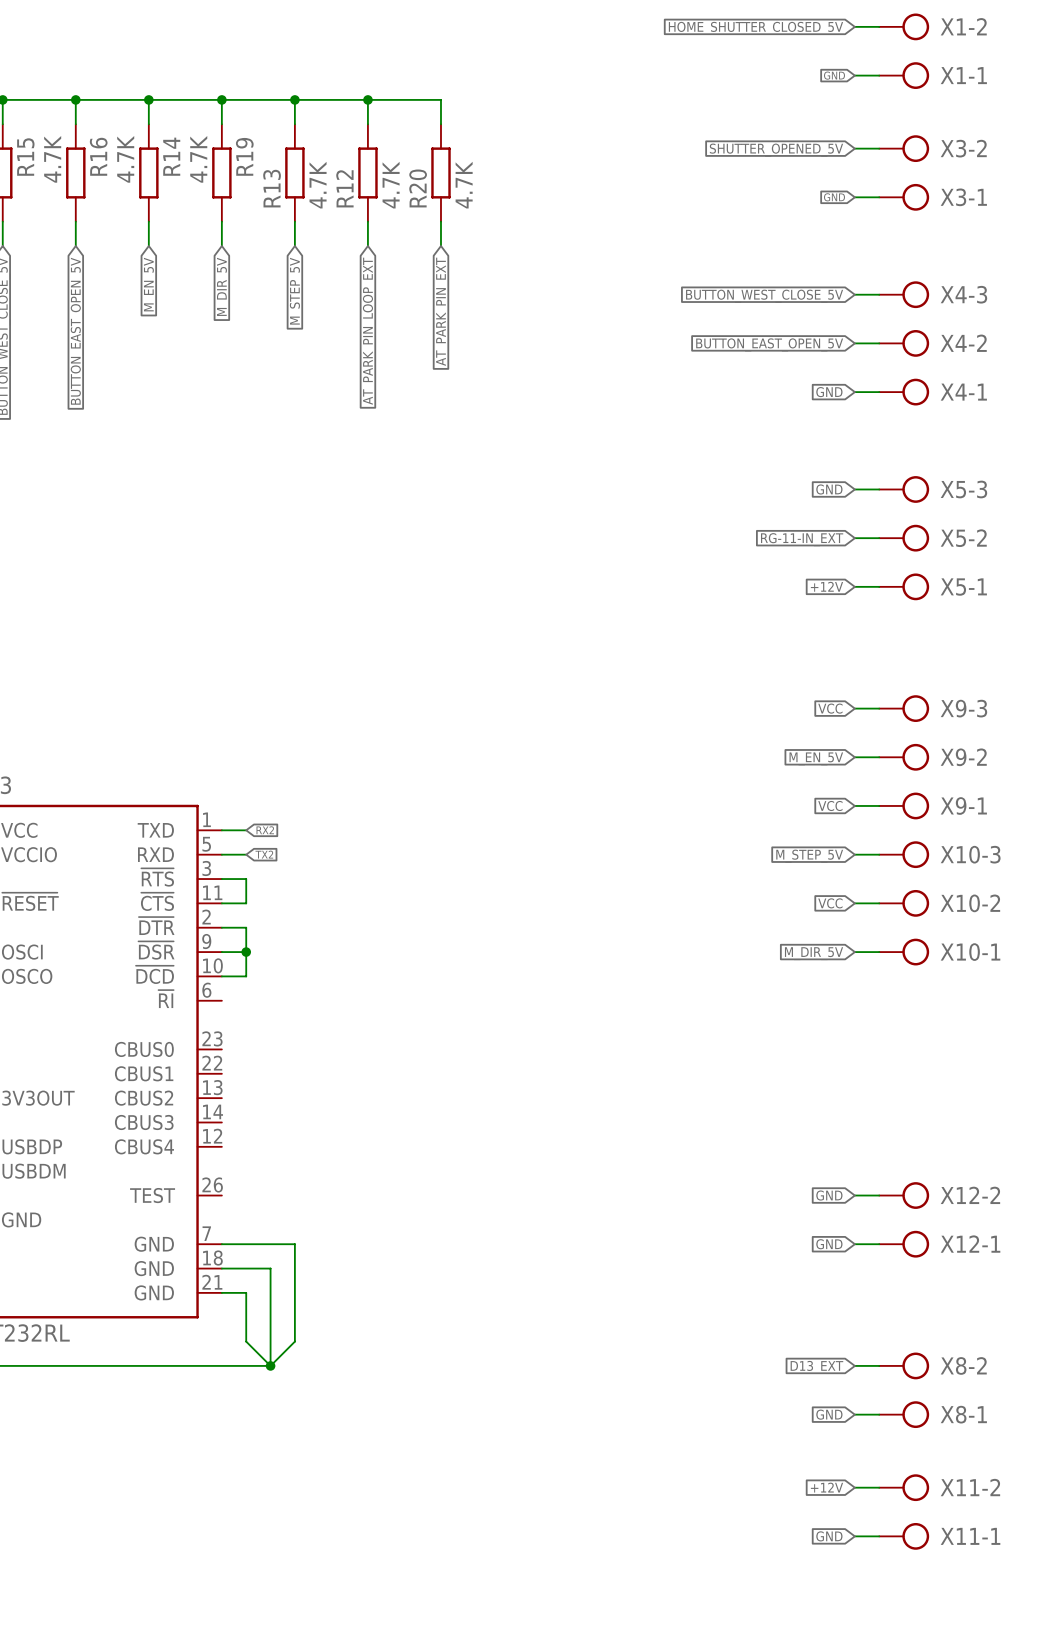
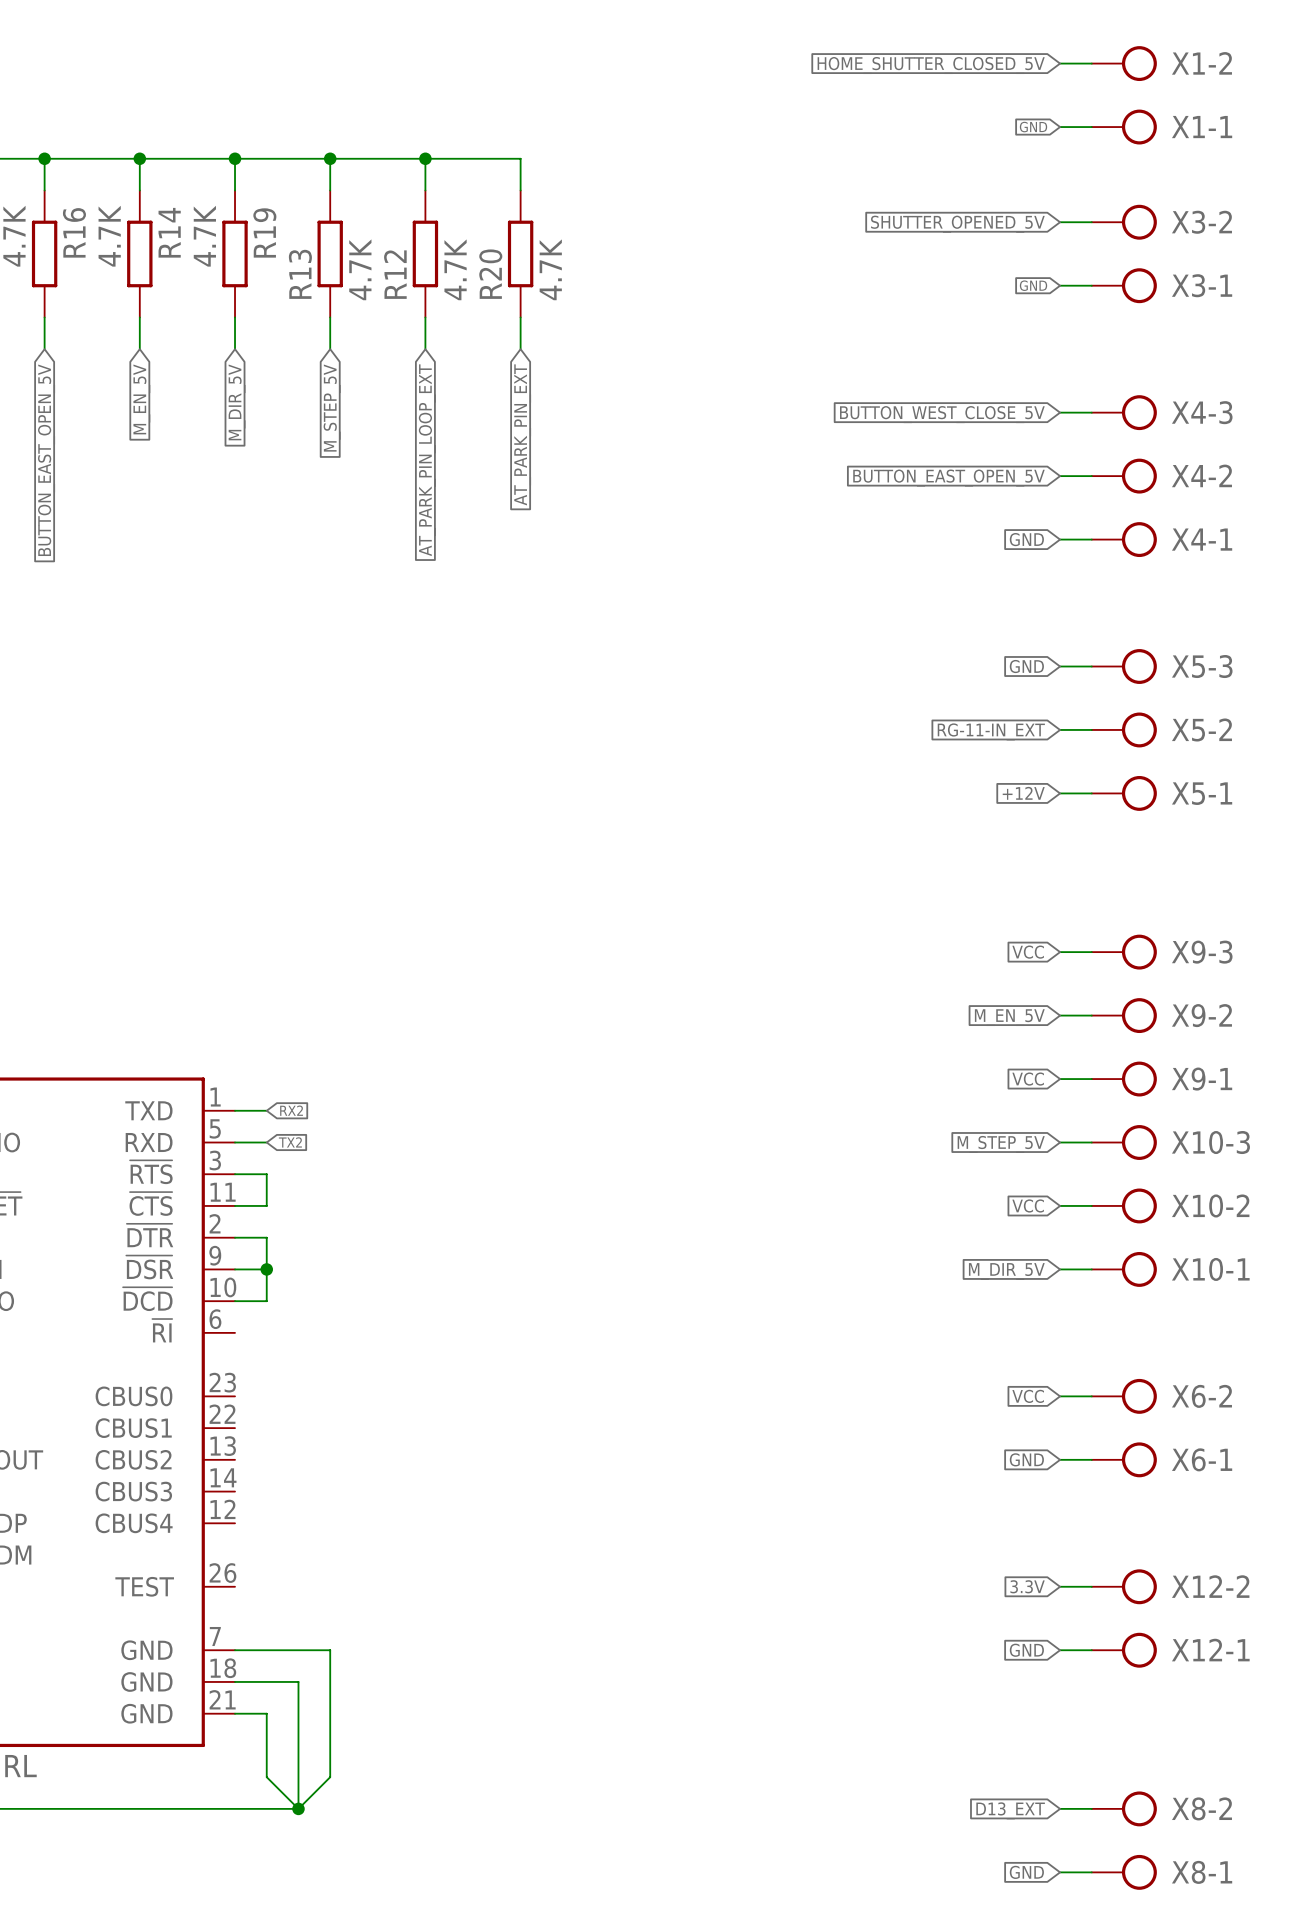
global label: none -> VCC (1028, 1396)
wire: none -> (1060, 1396) (1091, 1396)
X6-2: none -> (1124, 1396)
global label: none -> GND (1026, 1459)
wire: none -> (1060, 1459) (1091, 1459)
X6-1: none -> (1124, 1459)
global label: GND (829, 1195) -> 3.3V (1027, 1586)

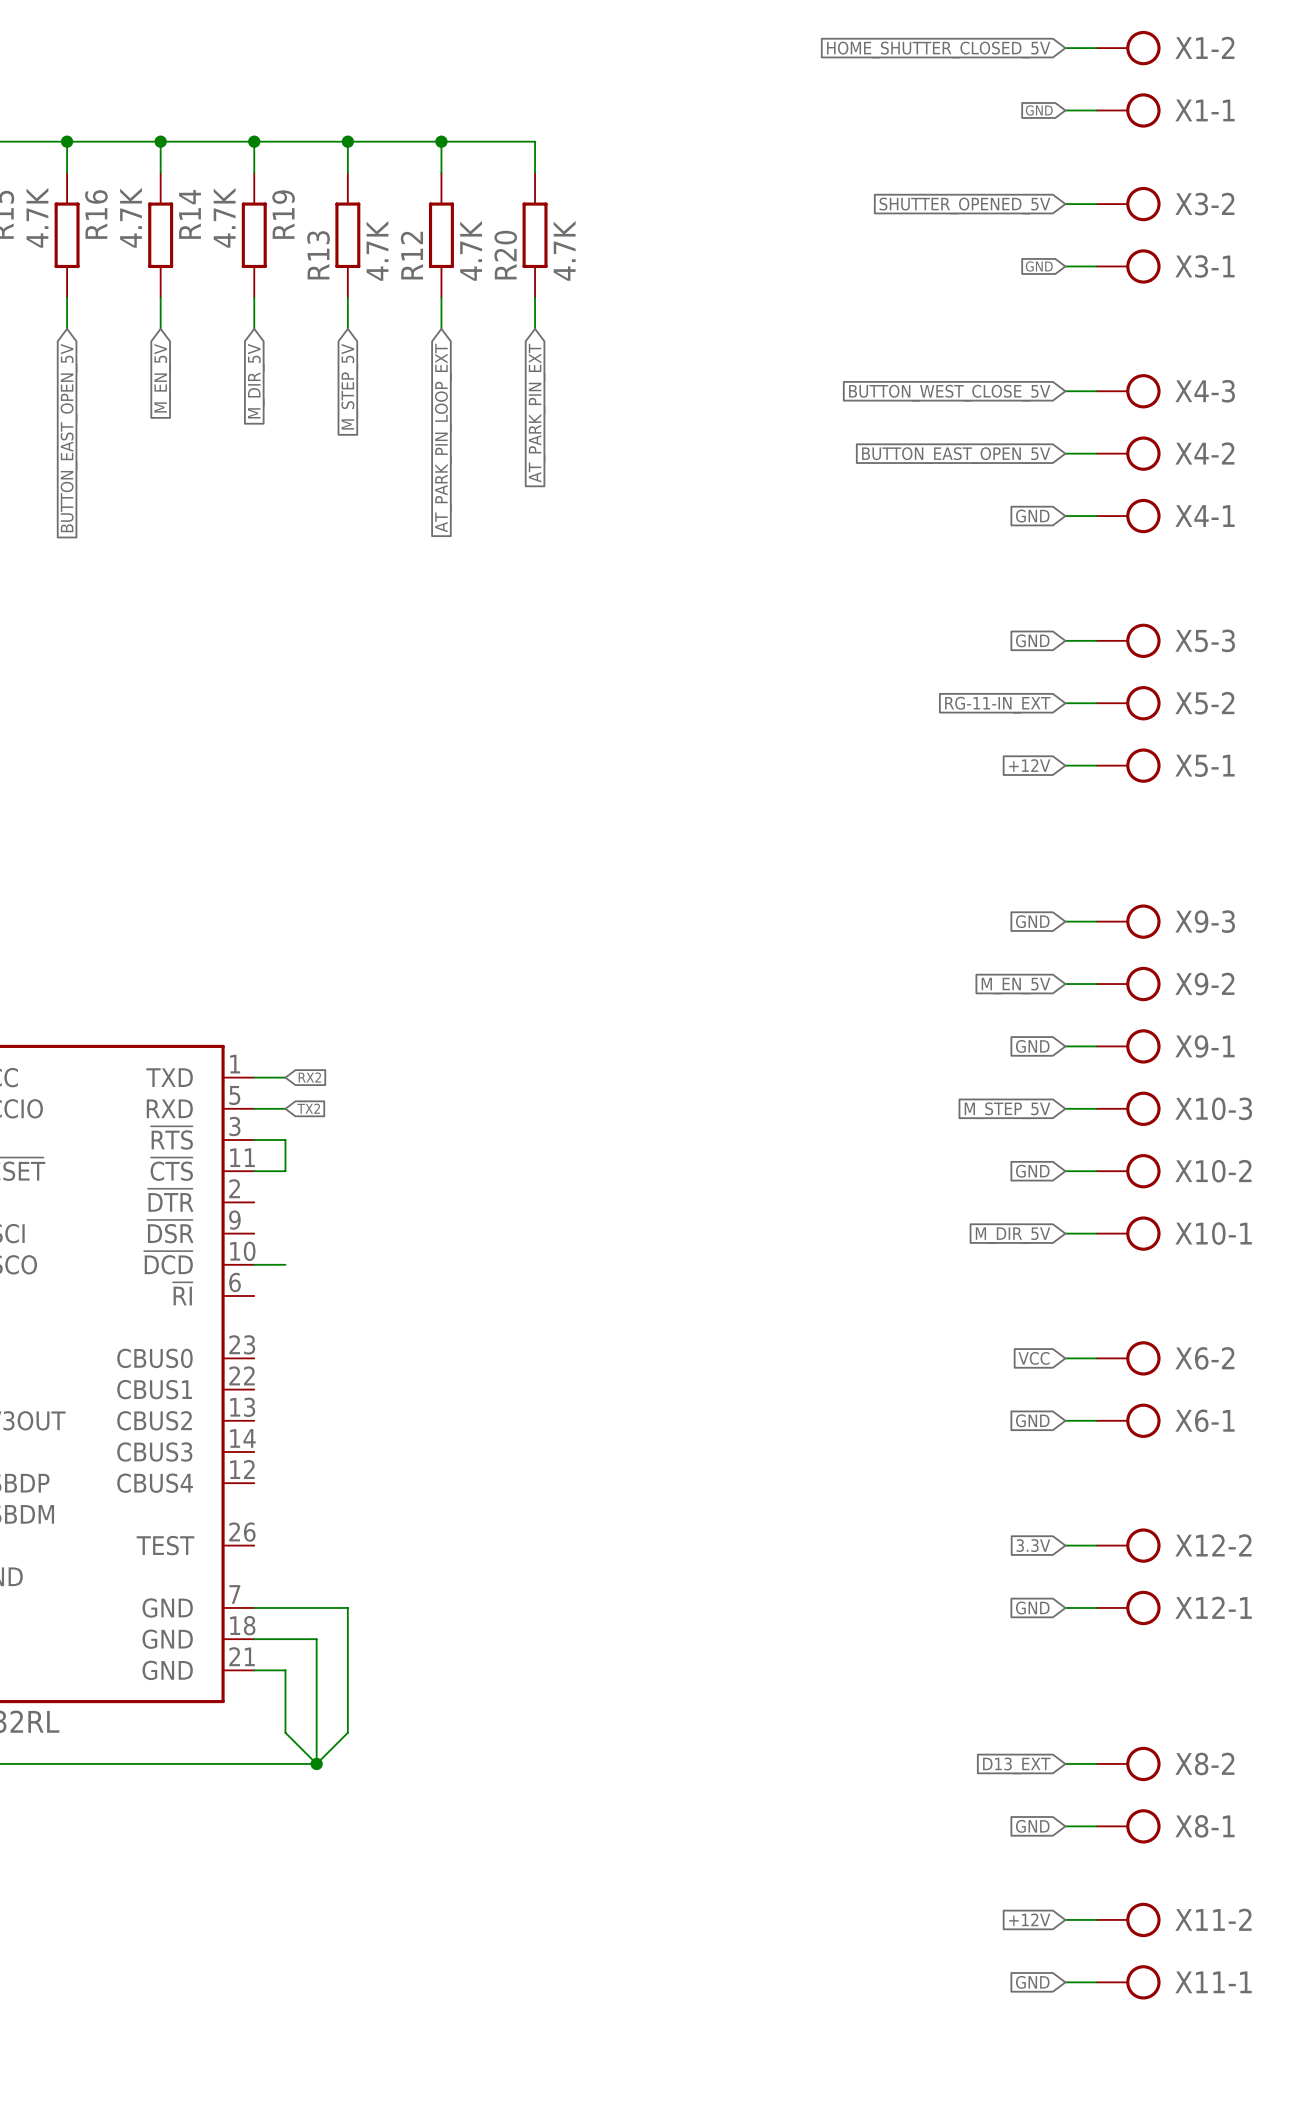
global label: VCC (1028, 952) -> GND (1032, 921)
global label: VCC (1028, 1079) -> GND (1032, 1046)
global label: VCC (1028, 1205) -> GND (1032, 1171)
wire: (235, 1237) (266, 1237) (266, 1301) -> none
wire: (235, 1269) (266, 1269) -> none
junction: (266, 1269) -> none

